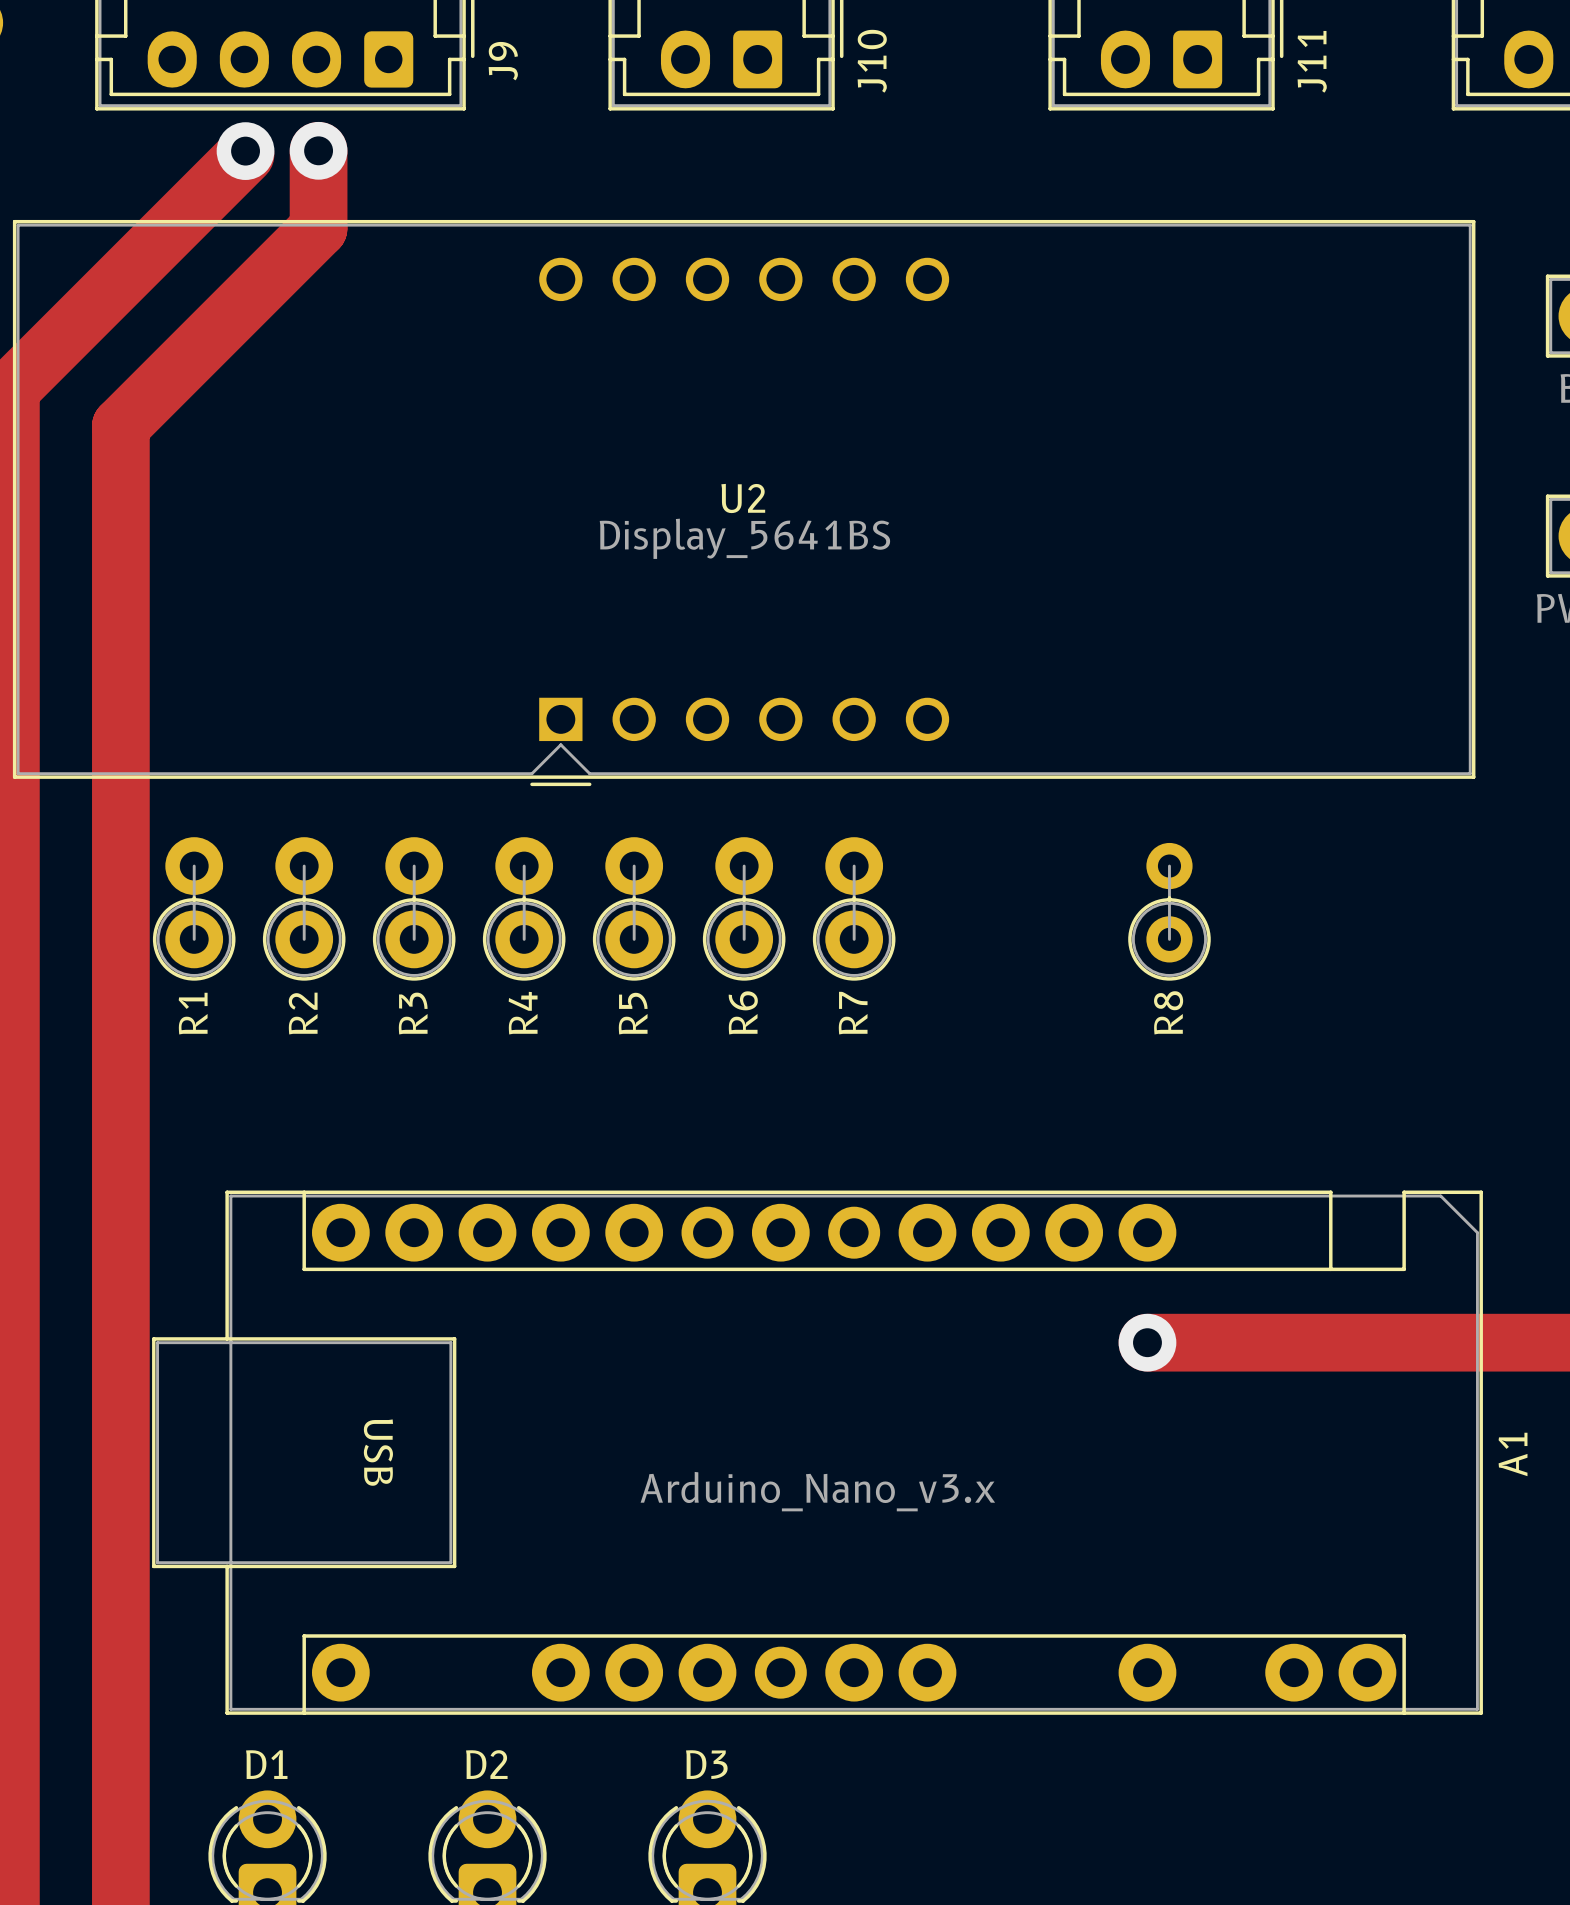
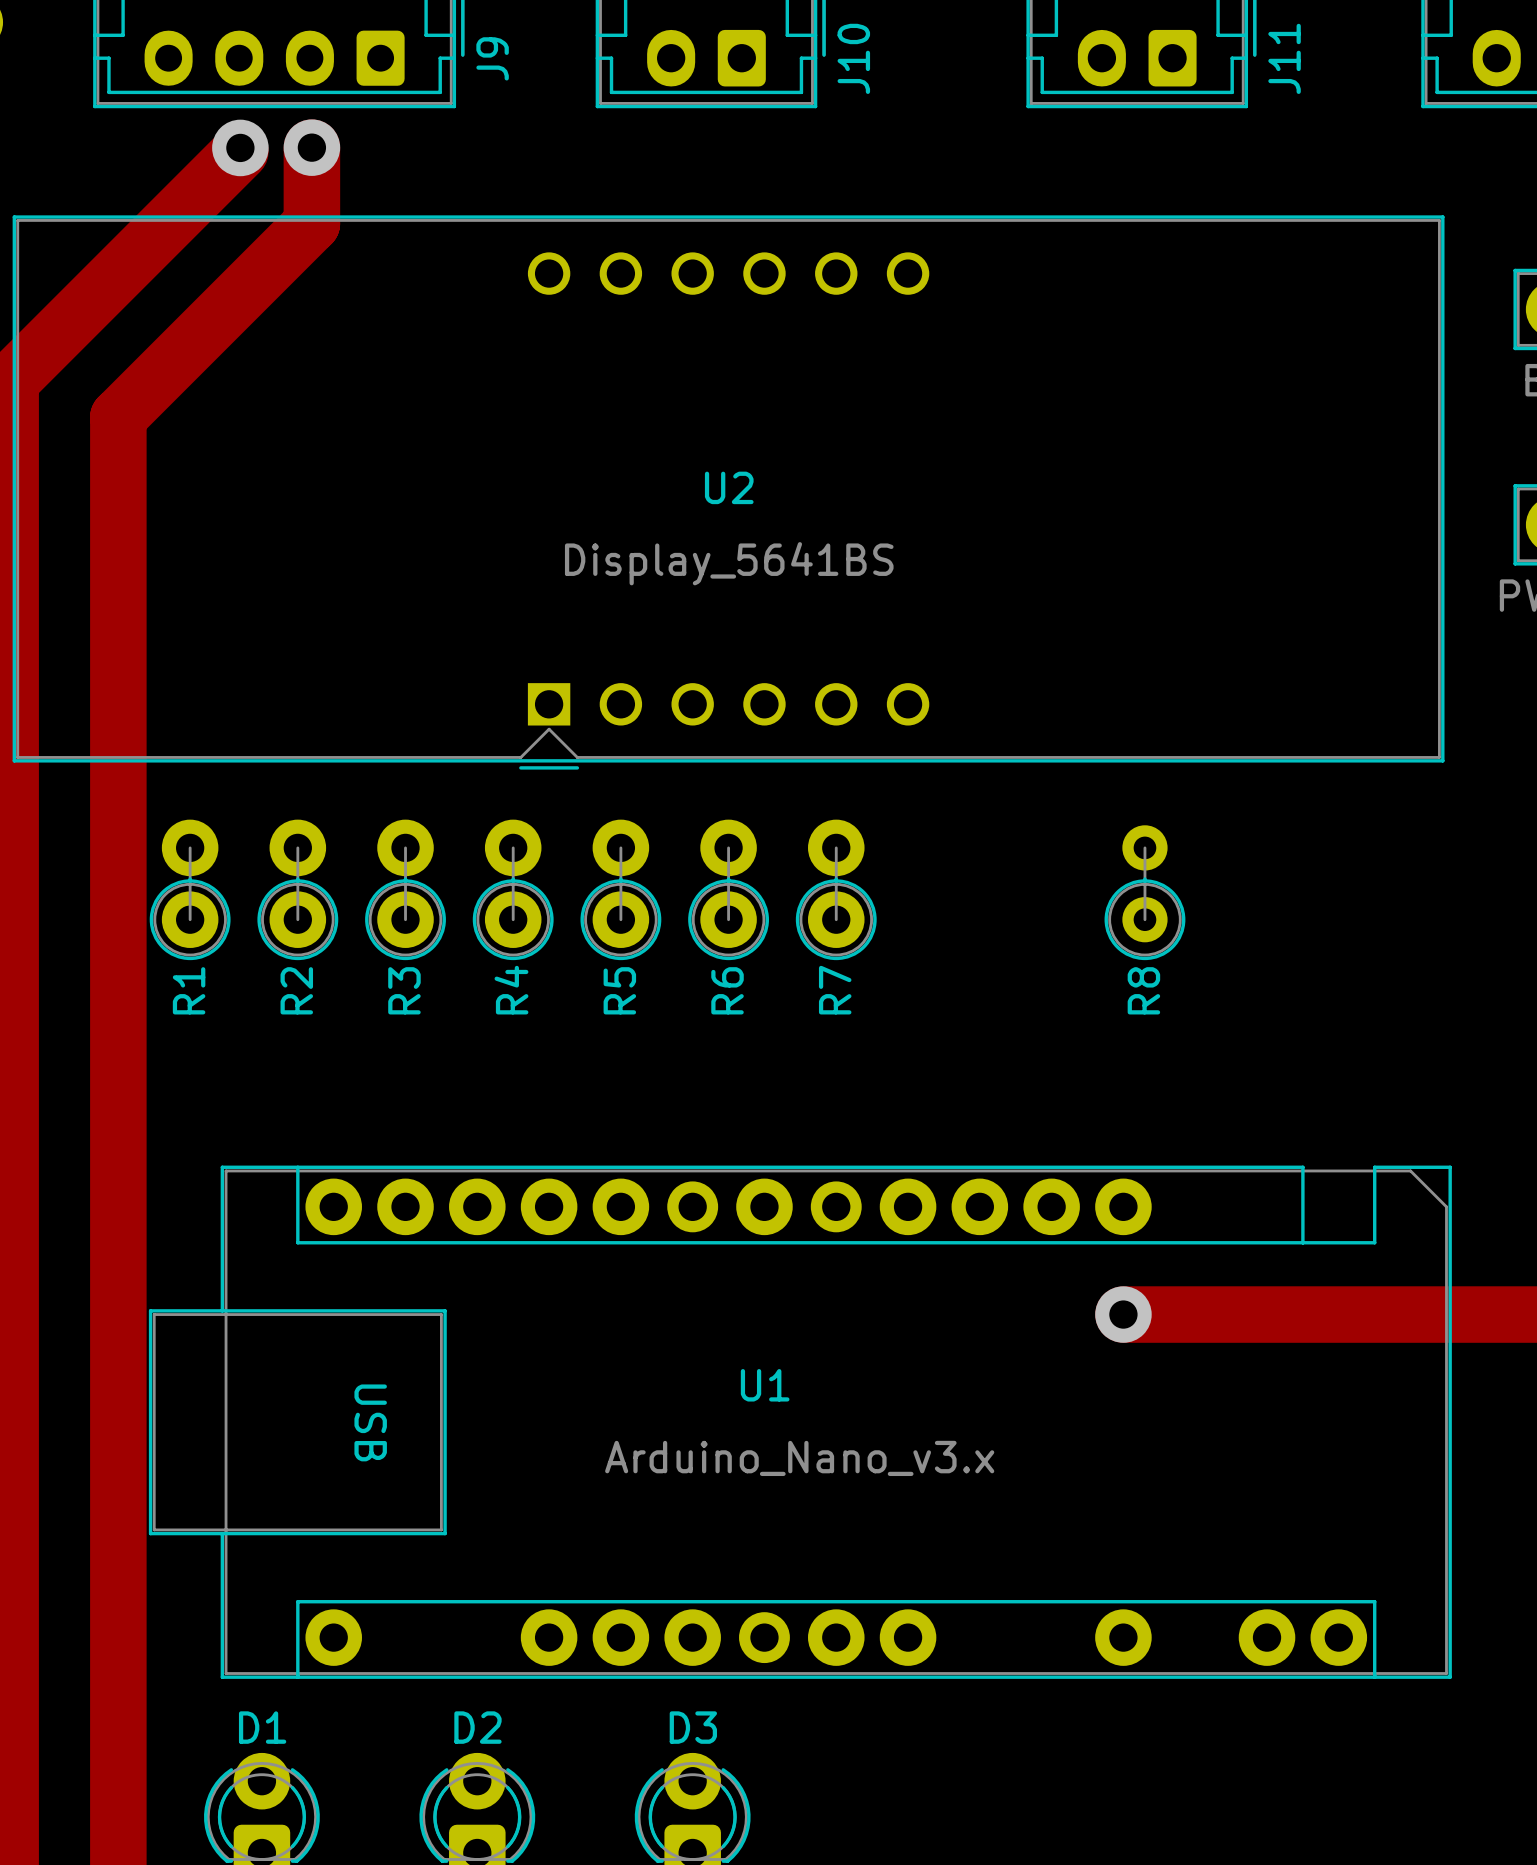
U2 value position: Display_5641BS (744, 538) -> Display_5641BS (729, 563)
A1 name: A1 (1513, 1454) -> U1 (765, 1385)

